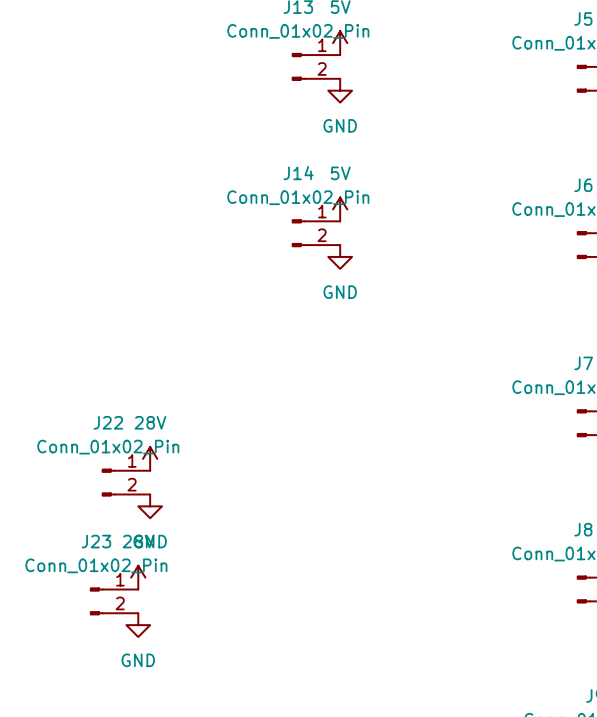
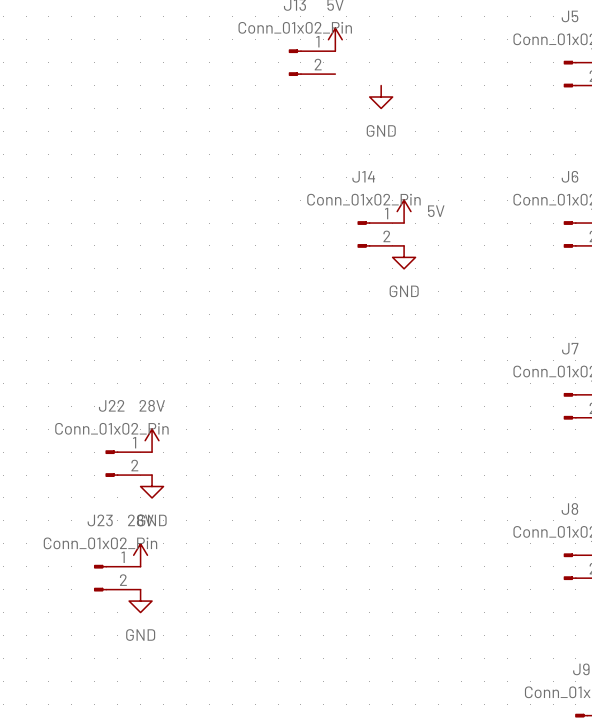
power symbol position: GND (340, 90) -> GND (381, 97)
power symbol text position: 5V (340, 173) -> 5V (436, 211)
power symbol position: 5V (340, 209) -> 5V (404, 211)
J14 position: (316, 233) -> (380, 234)
power symbol position: GND (340, 256) -> GND (404, 257)

